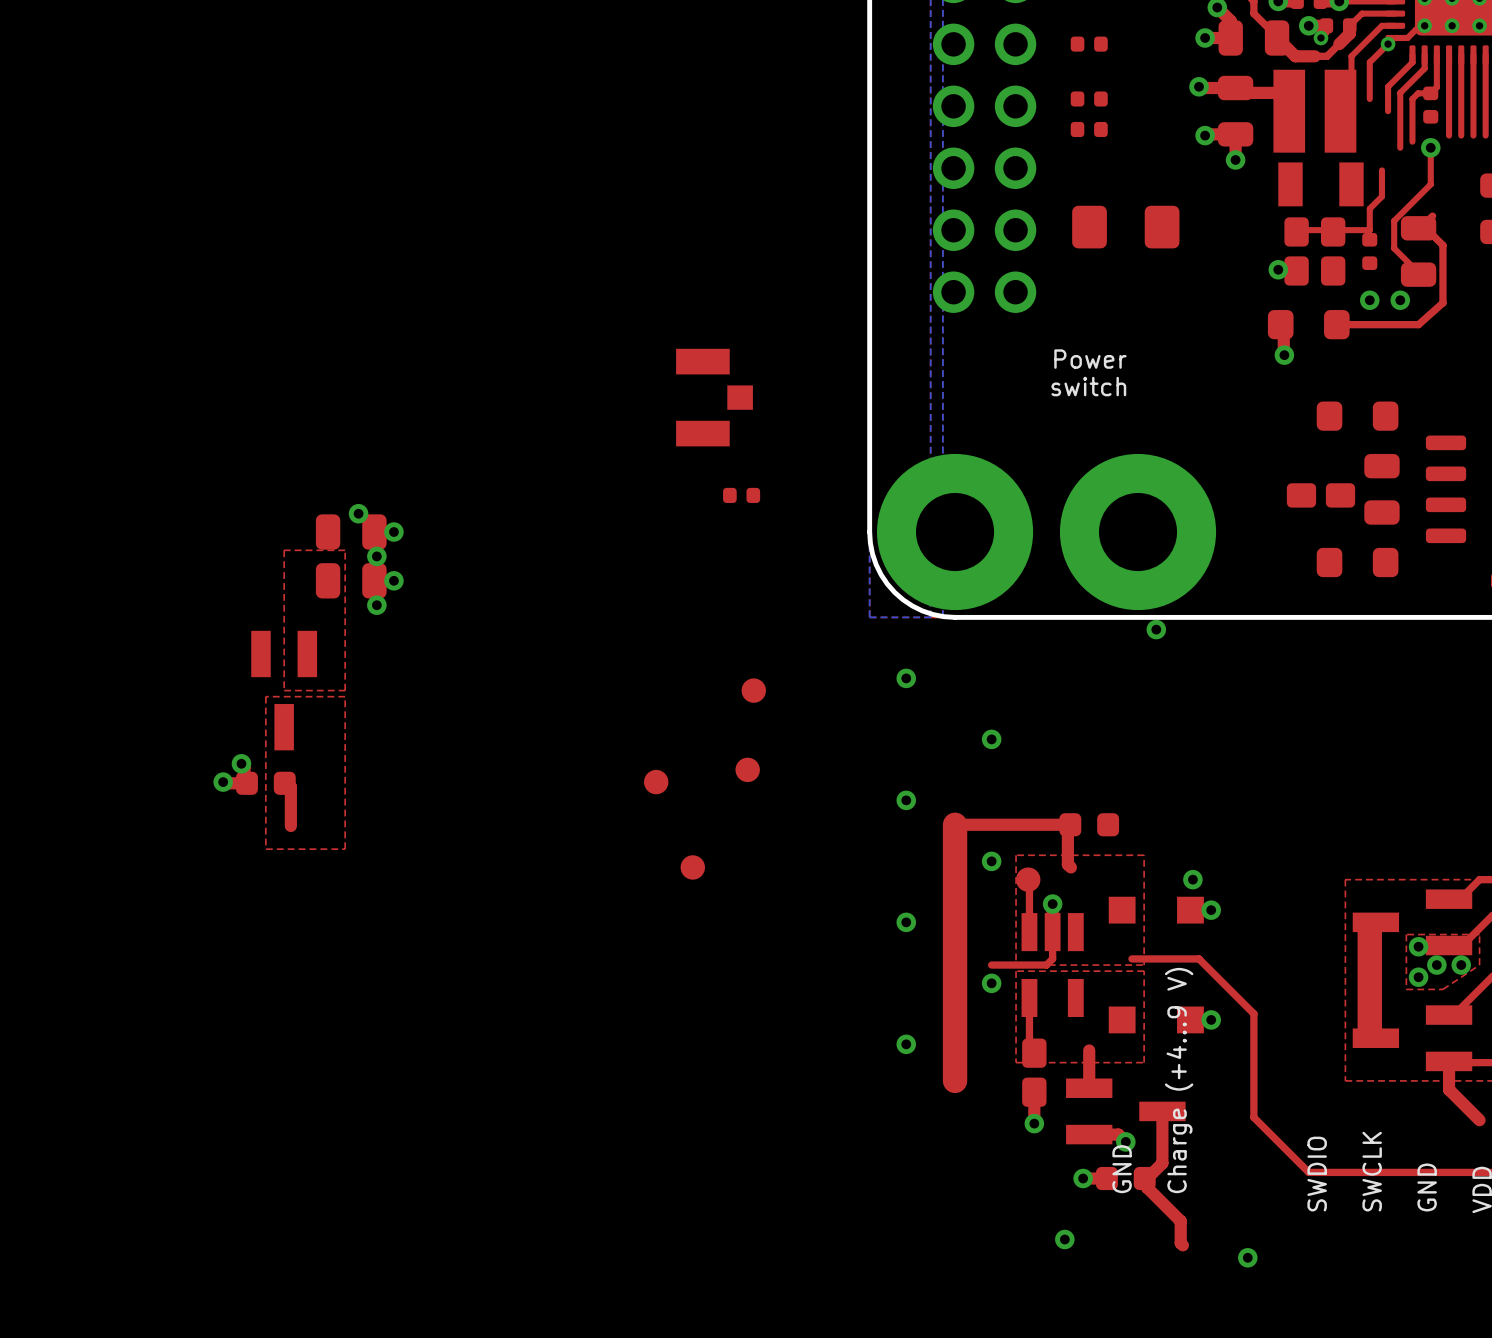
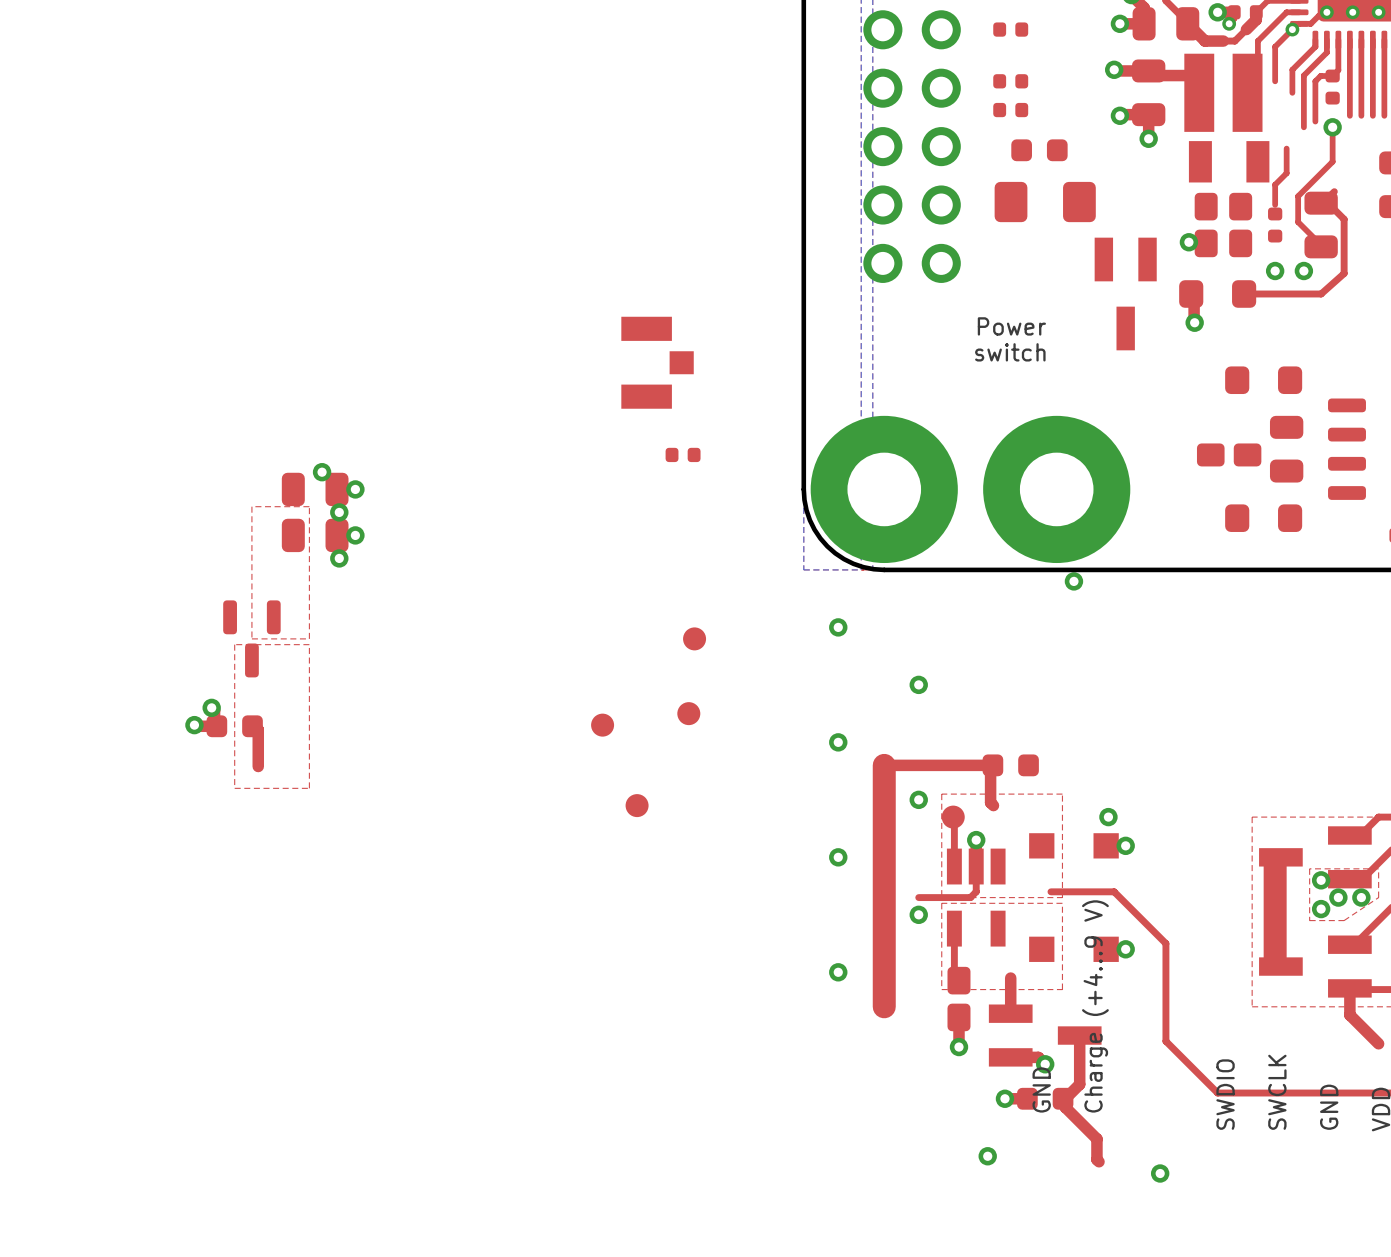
part: none -> (1039, 150)
top track: (1369, 230) (1296, 230) -> none
part: none -> (1125, 293)
part footprint: [251, 630, 318, 751] -> [223, 600, 281, 678]

